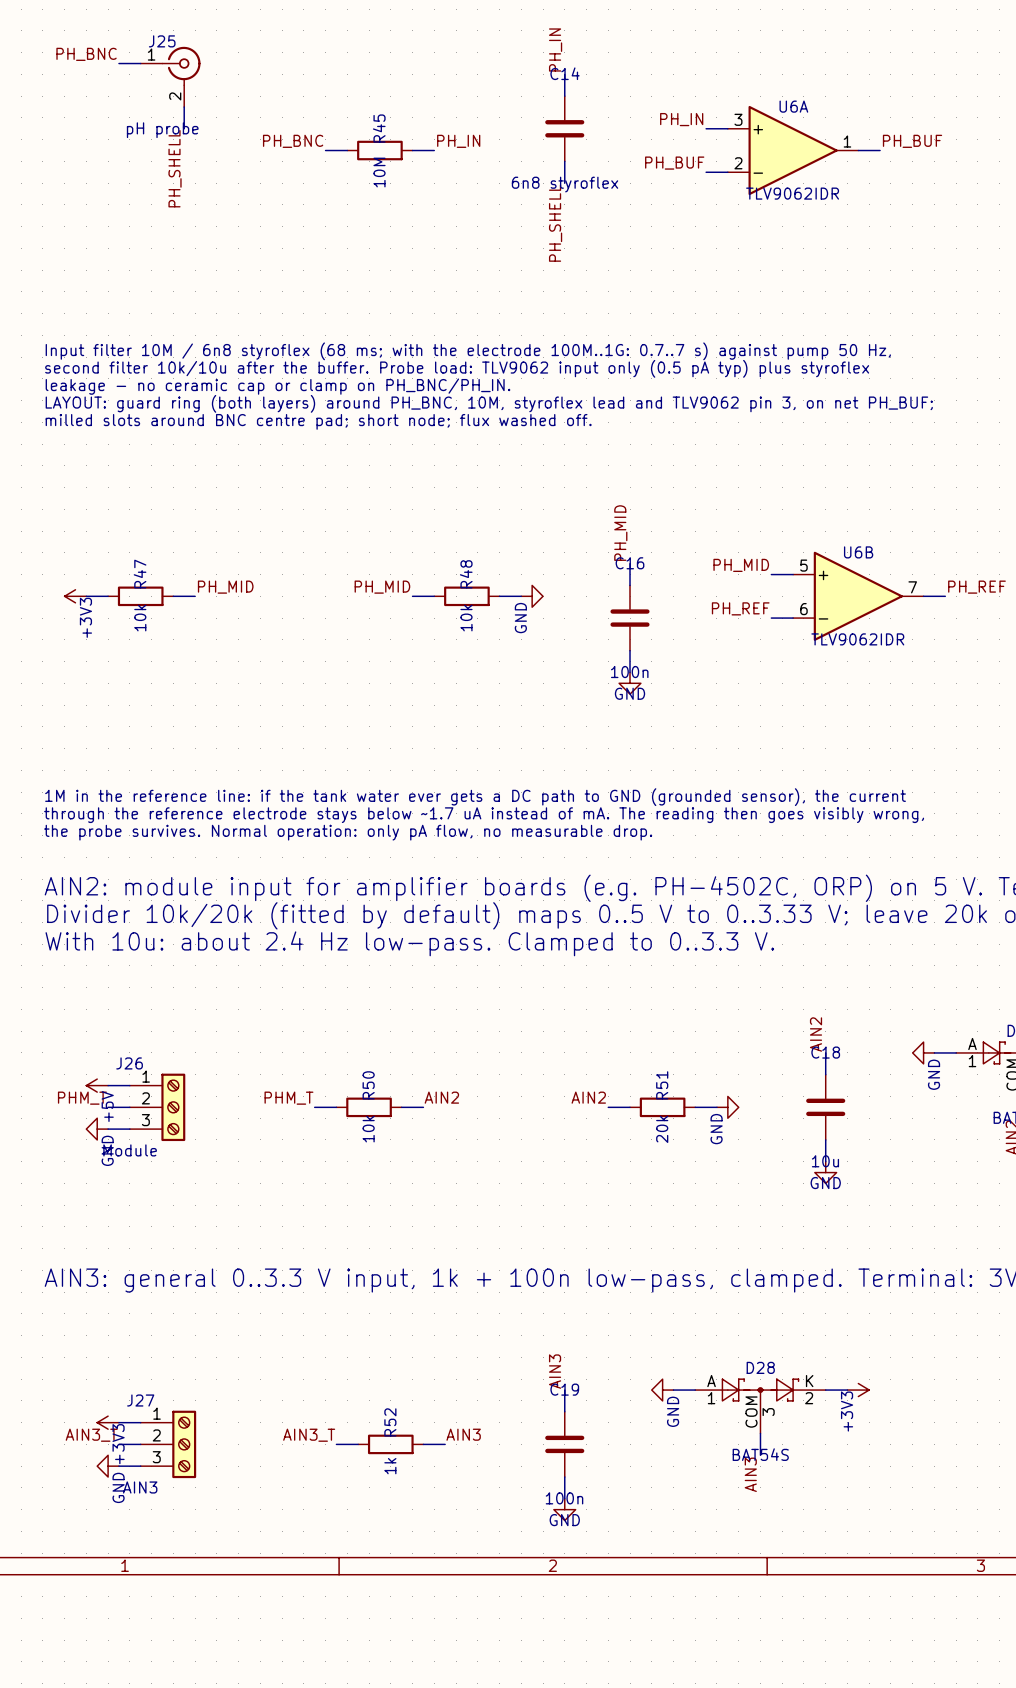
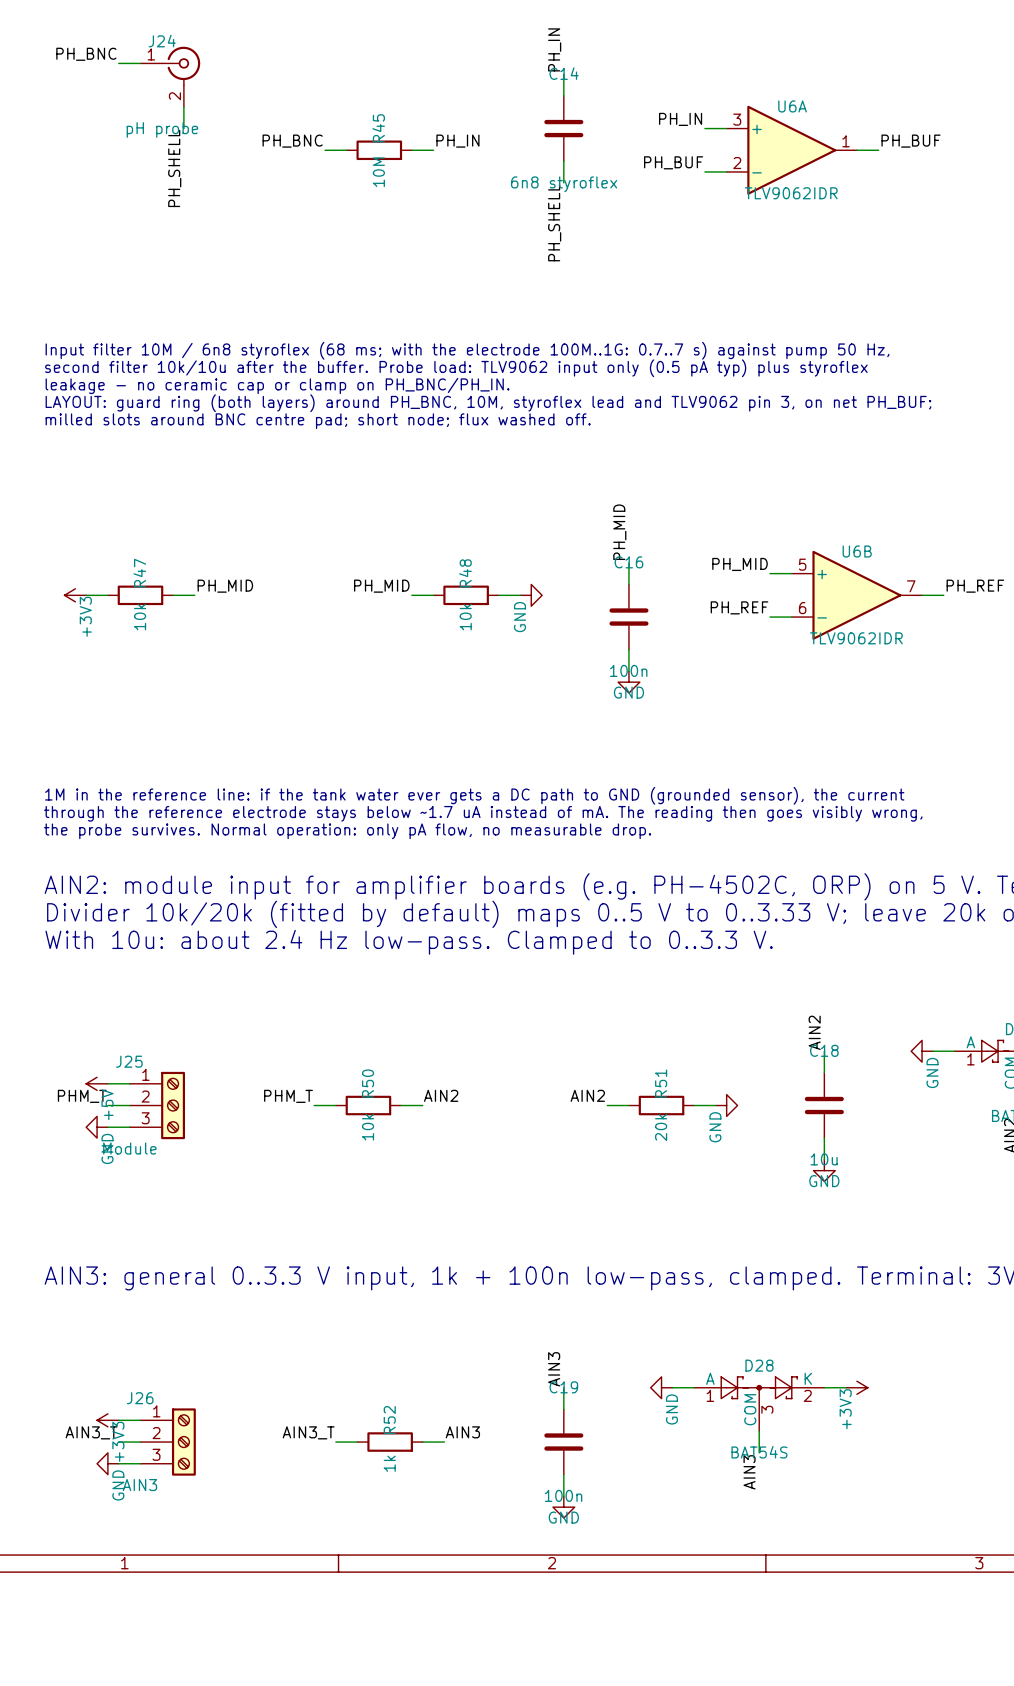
J25 name: J25 (162, 41) -> J24 (162, 41)
J26 name: J26 (129, 1063) -> J25 (129, 1061)
J27 name: J27 (140, 1400) -> J26 (140, 1398)

